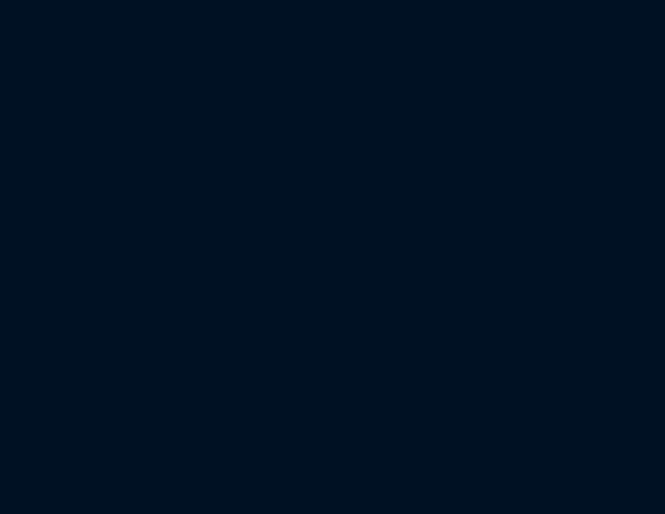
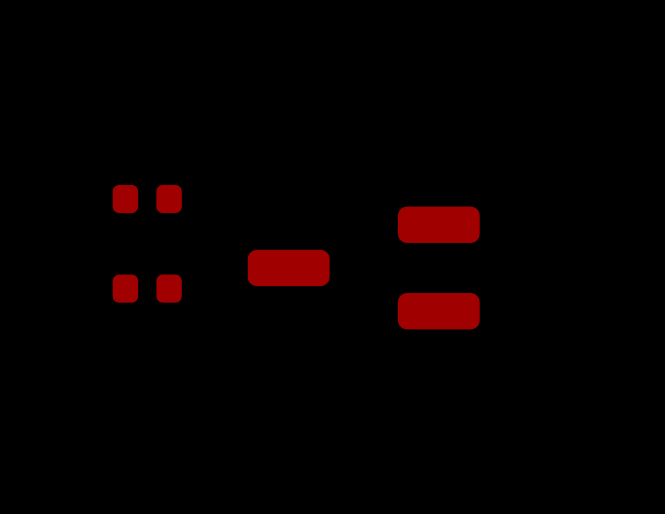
part: none -> (147, 199)
part: none -> (363, 267)
part: none -> (147, 288)

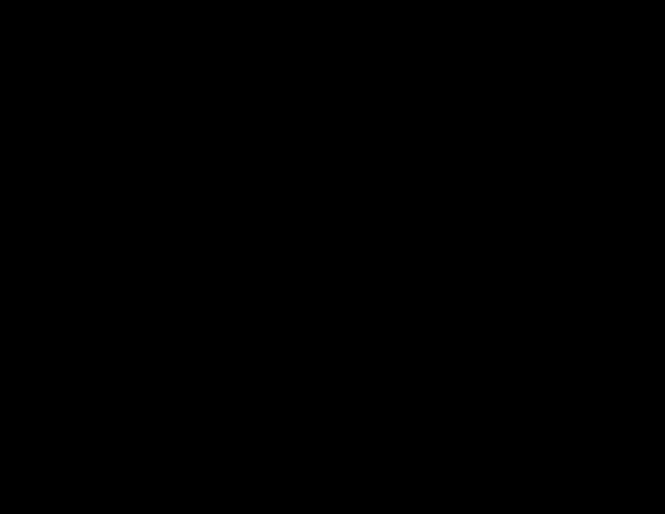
part: (147, 199) -> none
part: (363, 267) -> none
part: (147, 288) -> none

